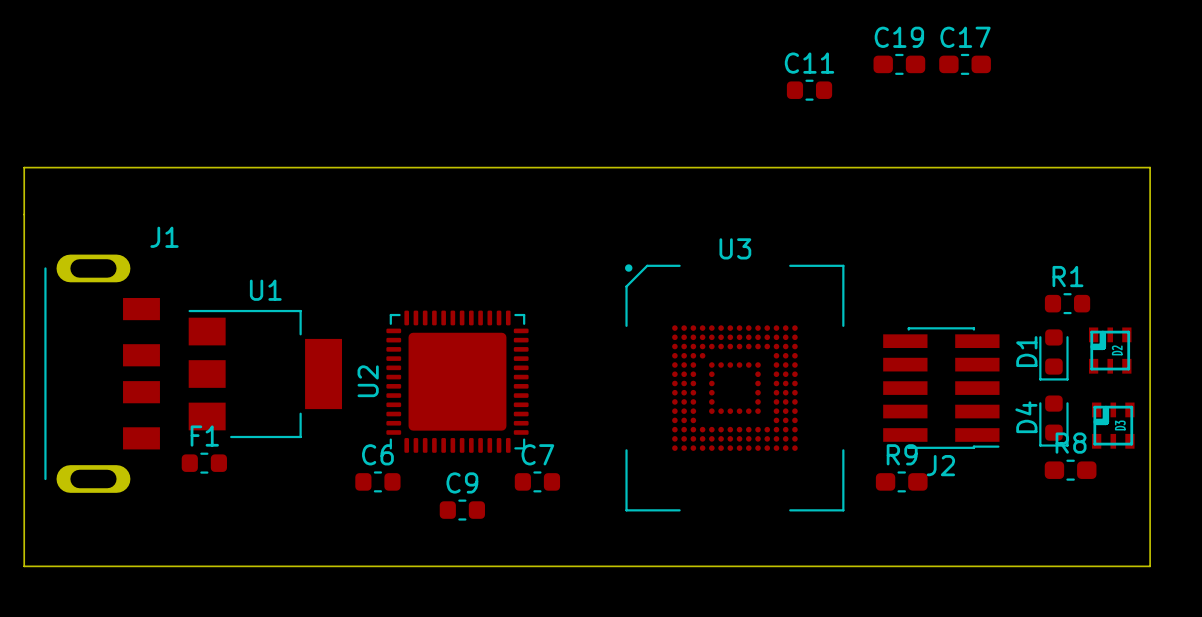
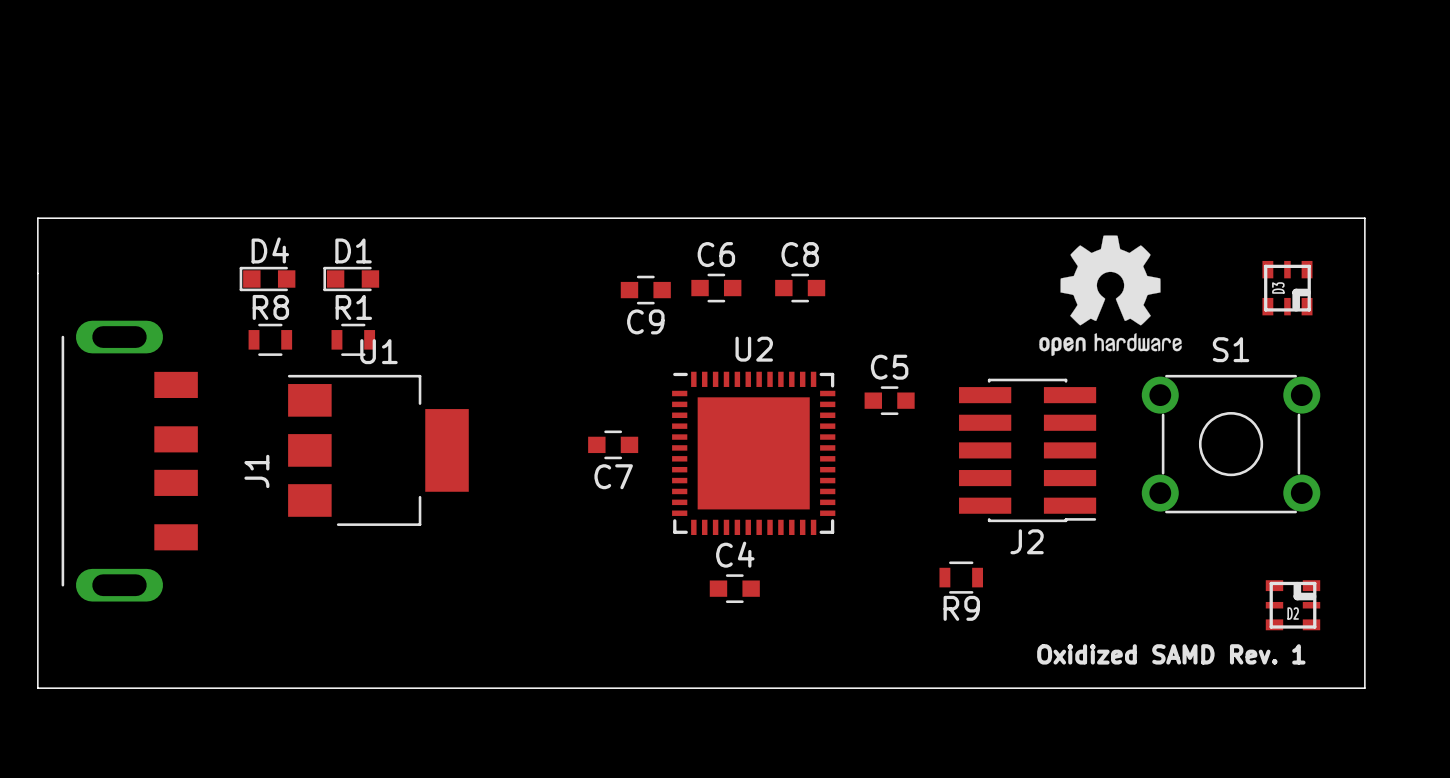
C19: (899, 64) -> none
C17: (965, 64) -> none
C11: (809, 90) -> none
drawing: none -> [1039, 235, 1182, 357]
C8: none -> (800, 288)
J1 name rotation: 0° (164, 237) -> 90° counterclockwise (256, 471)
J1 name position: J1 (164, 237) -> J1 (256, 471)
R1 footprint: [1044, 293, 1091, 315] -> [331, 323, 376, 356]
U2 footprint: [386, 310, 529, 453] -> [672, 371, 836, 536]
C5: none -> (889, 400)
D1 footprint: [1039, 329, 1069, 381] -> [323, 266, 380, 292]
D2 rotation: 0° (1110, 350) -> 90° clockwise (1292, 605)
D2 position: (1110, 350) -> (1292, 605)
S1: none -> (1231, 444)
U1 position: (265, 374) -> (378, 450)
U2 name position: U2 (368, 381) -> U2 (754, 349)
U3: (734, 387) -> none
J2 position: (941, 388) -> (1027, 450)
D4 footprint: [1039, 395, 1069, 447] -> [239, 266, 296, 292]
D3 rotation: 0° (1113, 425) -> 180° (1287, 288)
D3 position: (1113, 425) -> (1287, 288)
C7 name position: C7 (537, 454) -> C7 (613, 476)
R9 name position: R9 (902, 454) -> R9 (961, 608)
R8 footprint: [1044, 459, 1097, 481] -> [248, 323, 293, 356]
F1: (204, 463) -> none
C6 footprint: [355, 471, 401, 493] -> [691, 273, 742, 303]
C7 footprint: [514, 471, 561, 493] -> [588, 430, 639, 460]
R9 footprint: [875, 471, 928, 493] -> [939, 561, 984, 594]
C4: none -> (734, 588)
C9 name position: C9 (462, 482) -> C9 (645, 321)
C9 footprint: [439, 499, 485, 521] -> [620, 275, 671, 305]
text: none -> Oxidized SAMD Rev. 1 (1171, 654)

